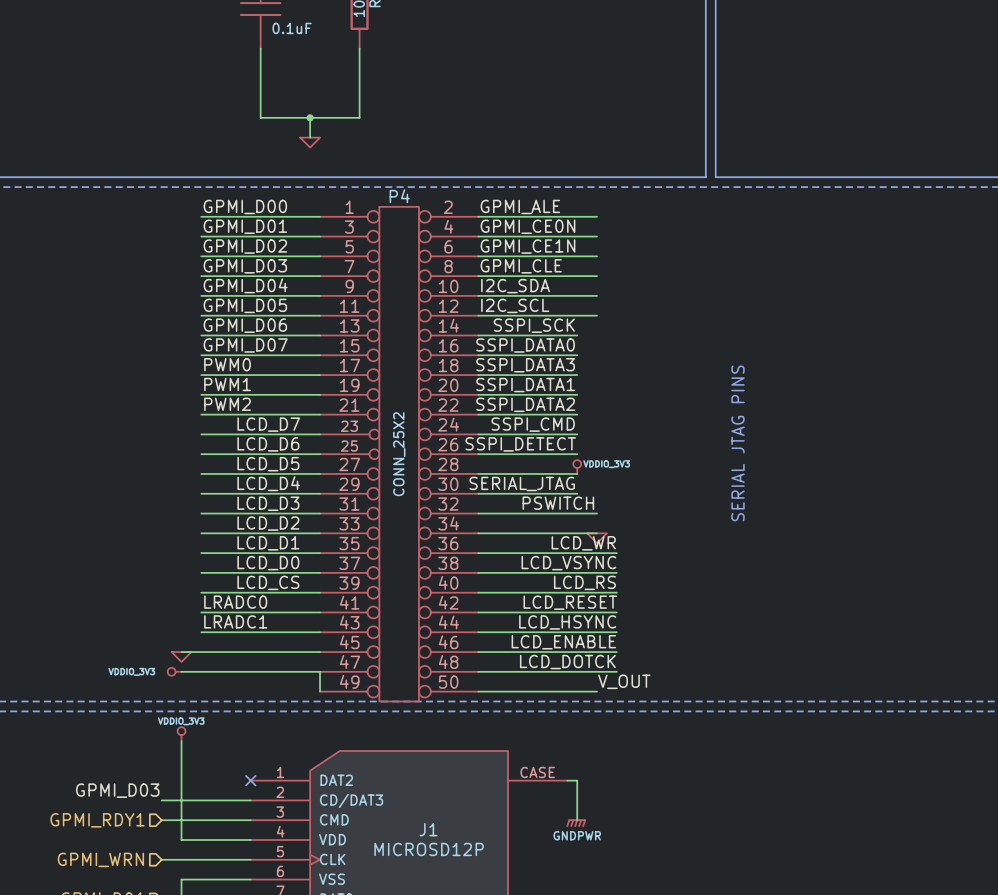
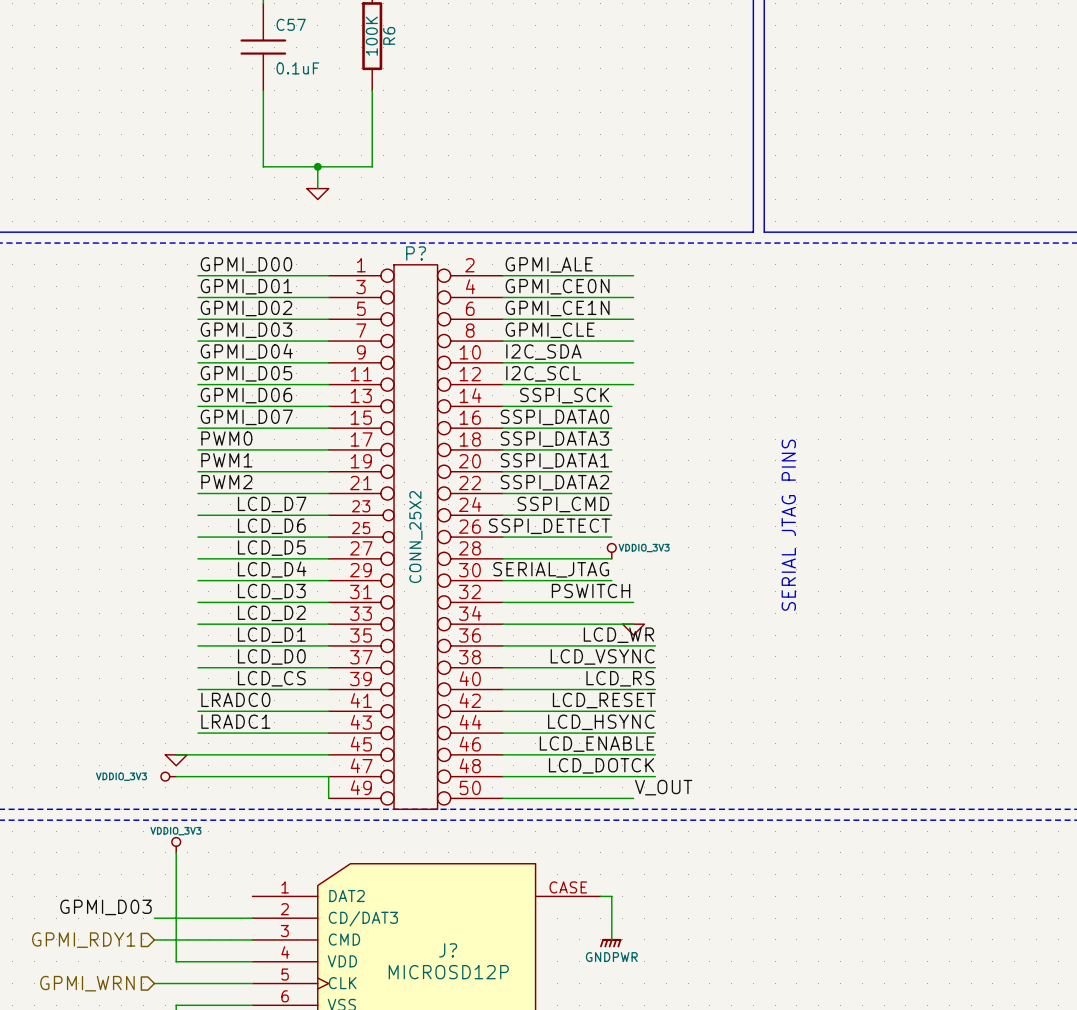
P4 name: P4 (399, 196) -> P? (416, 253)
no-connect mark: (250, 780) -> none
J1 name: J1 (428, 829) -> J? (448, 950)

